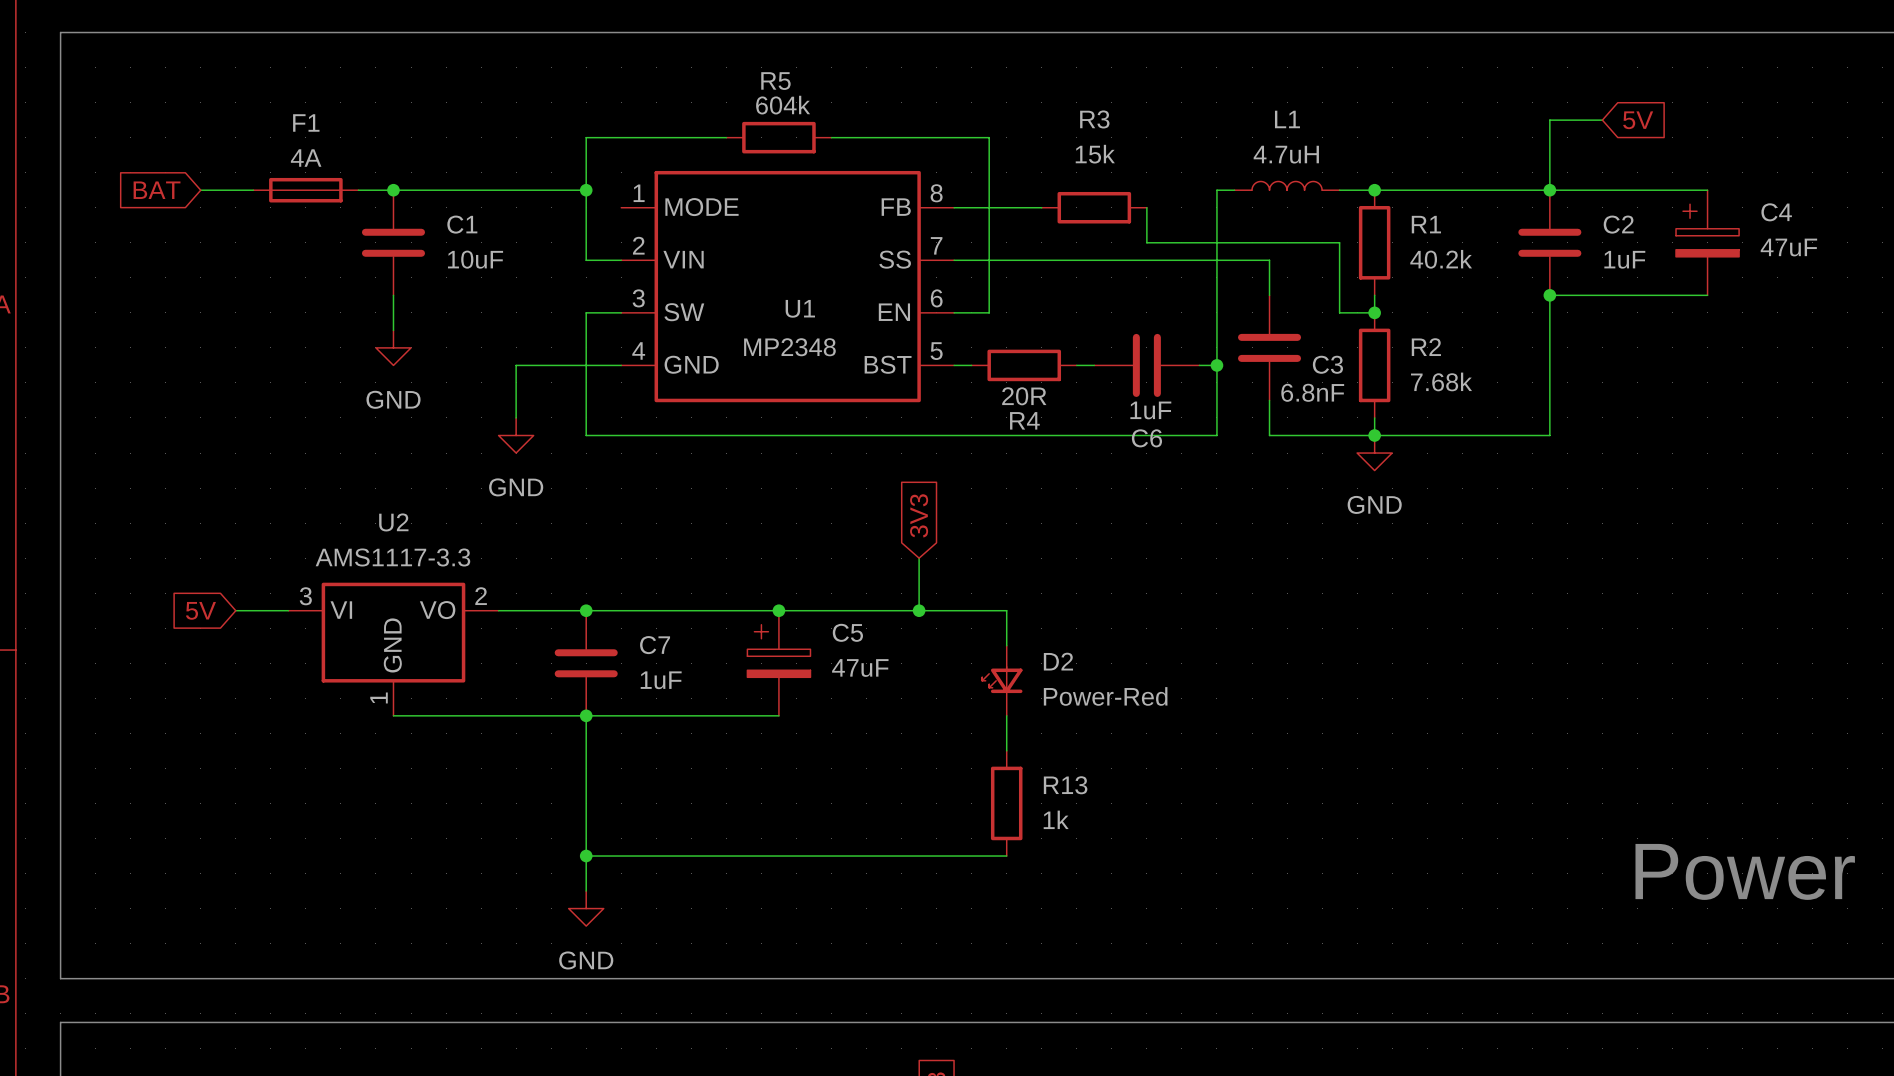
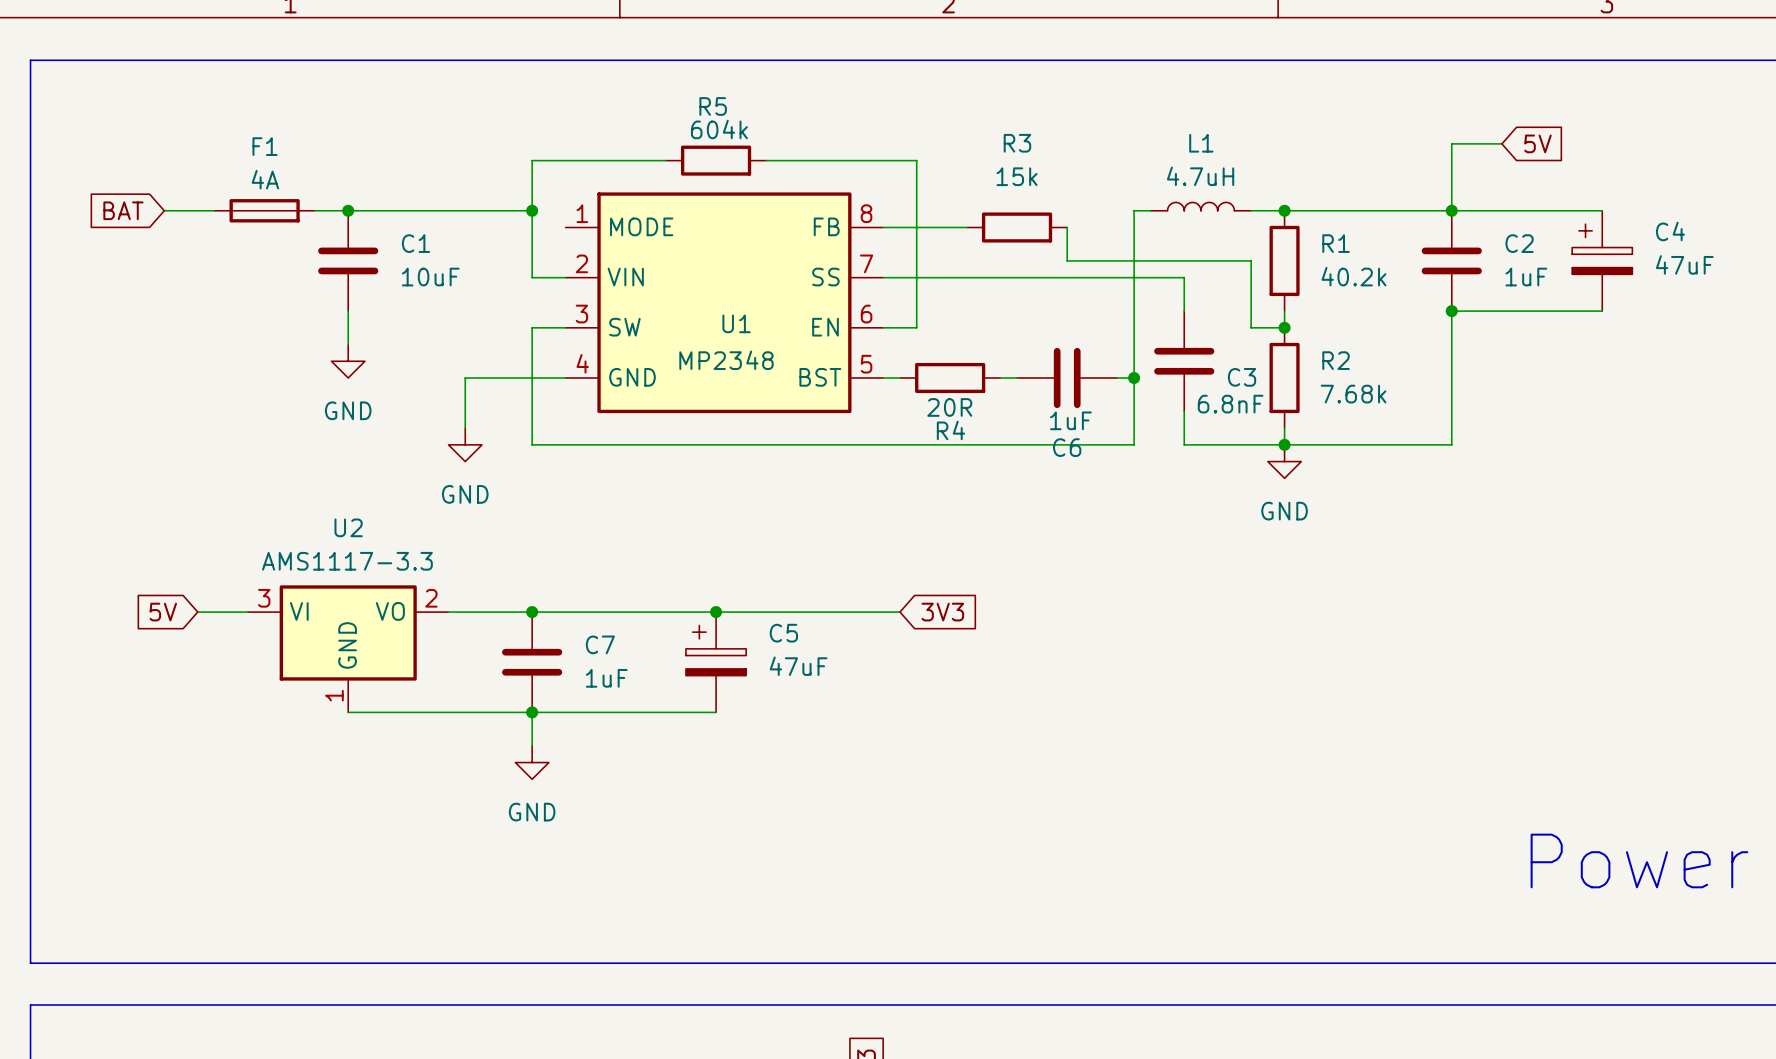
global label rotation: 0° (919, 515) -> 90° clockwise (942, 612)
global label position: 3V3 (919, 515) -> 3V3 (942, 612)
wire: (919, 558) (919, 610) -> none
junction: (919, 610) -> none
wire: (971, 610) (1006, 610) (1006, 645) -> none
D2: Power-Red (1002, 680) -> none
wire: (1006, 715) (1006, 750) -> none
wire: (586, 750) (586, 891) -> none
R13: 1k (1006, 803) -> none
wire: (586, 856) (1006, 856) -> none
junction: (586, 856) -> none
power symbol position: GND (586, 908) -> GND (532, 762)

